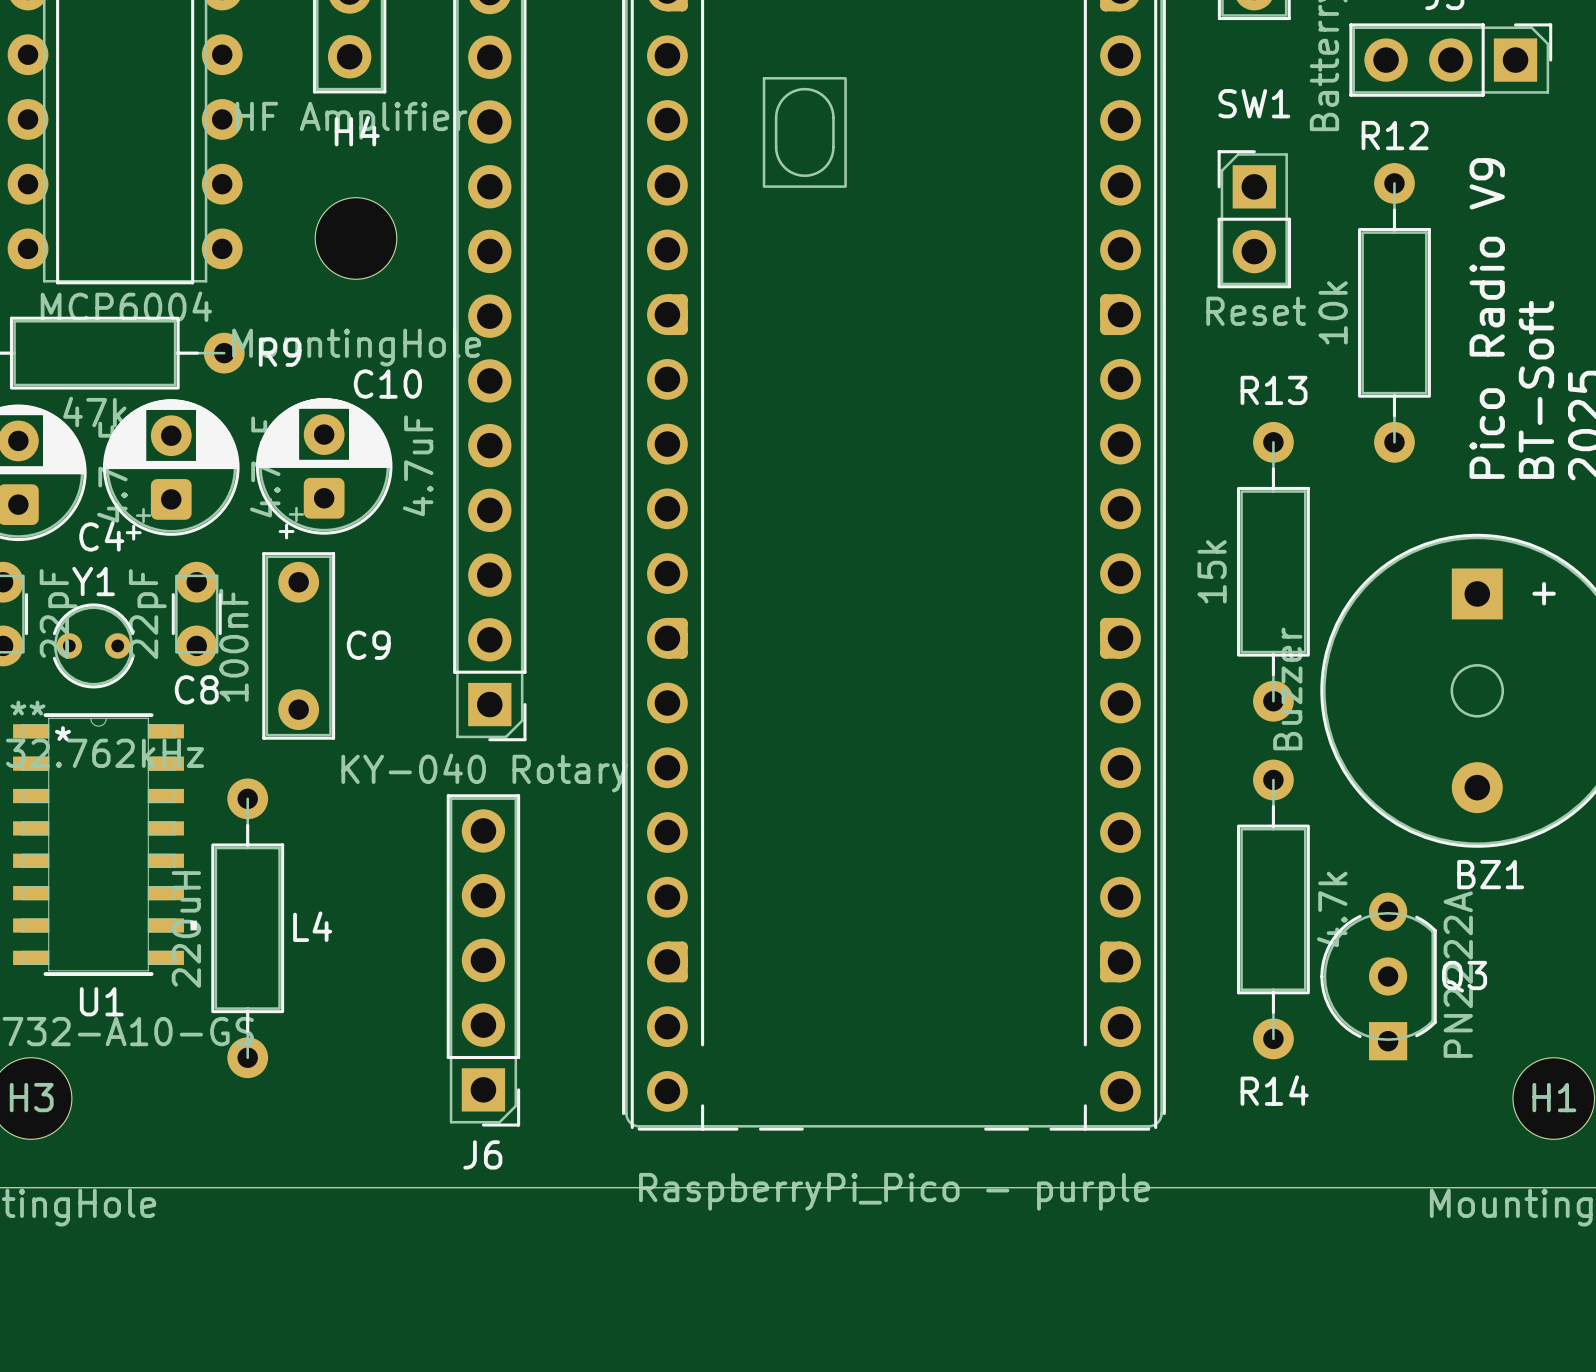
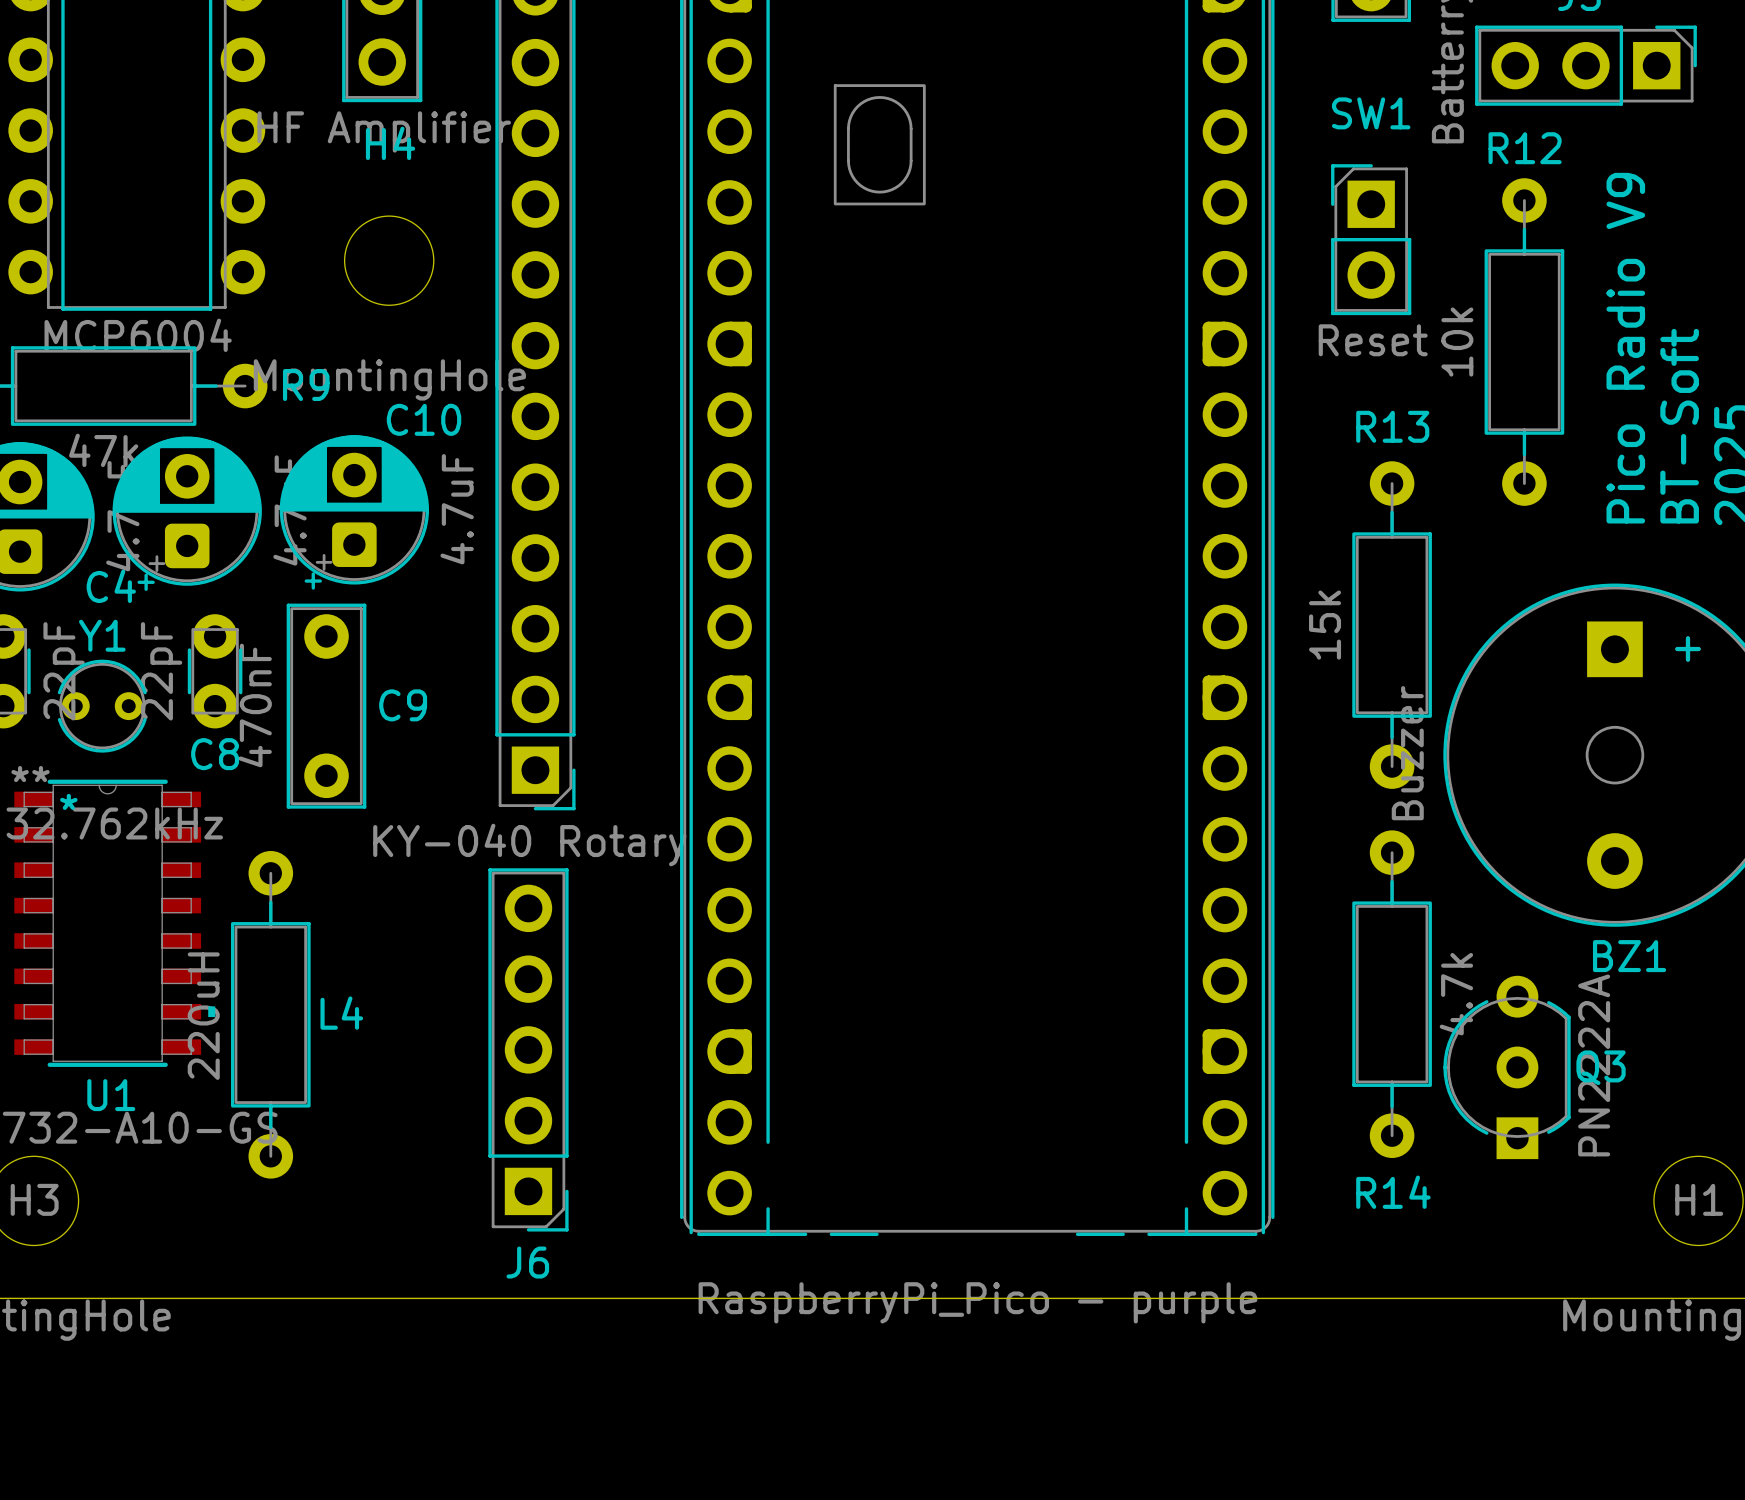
C9 value: 100nF (234, 645) -> 470nF (255, 705)

